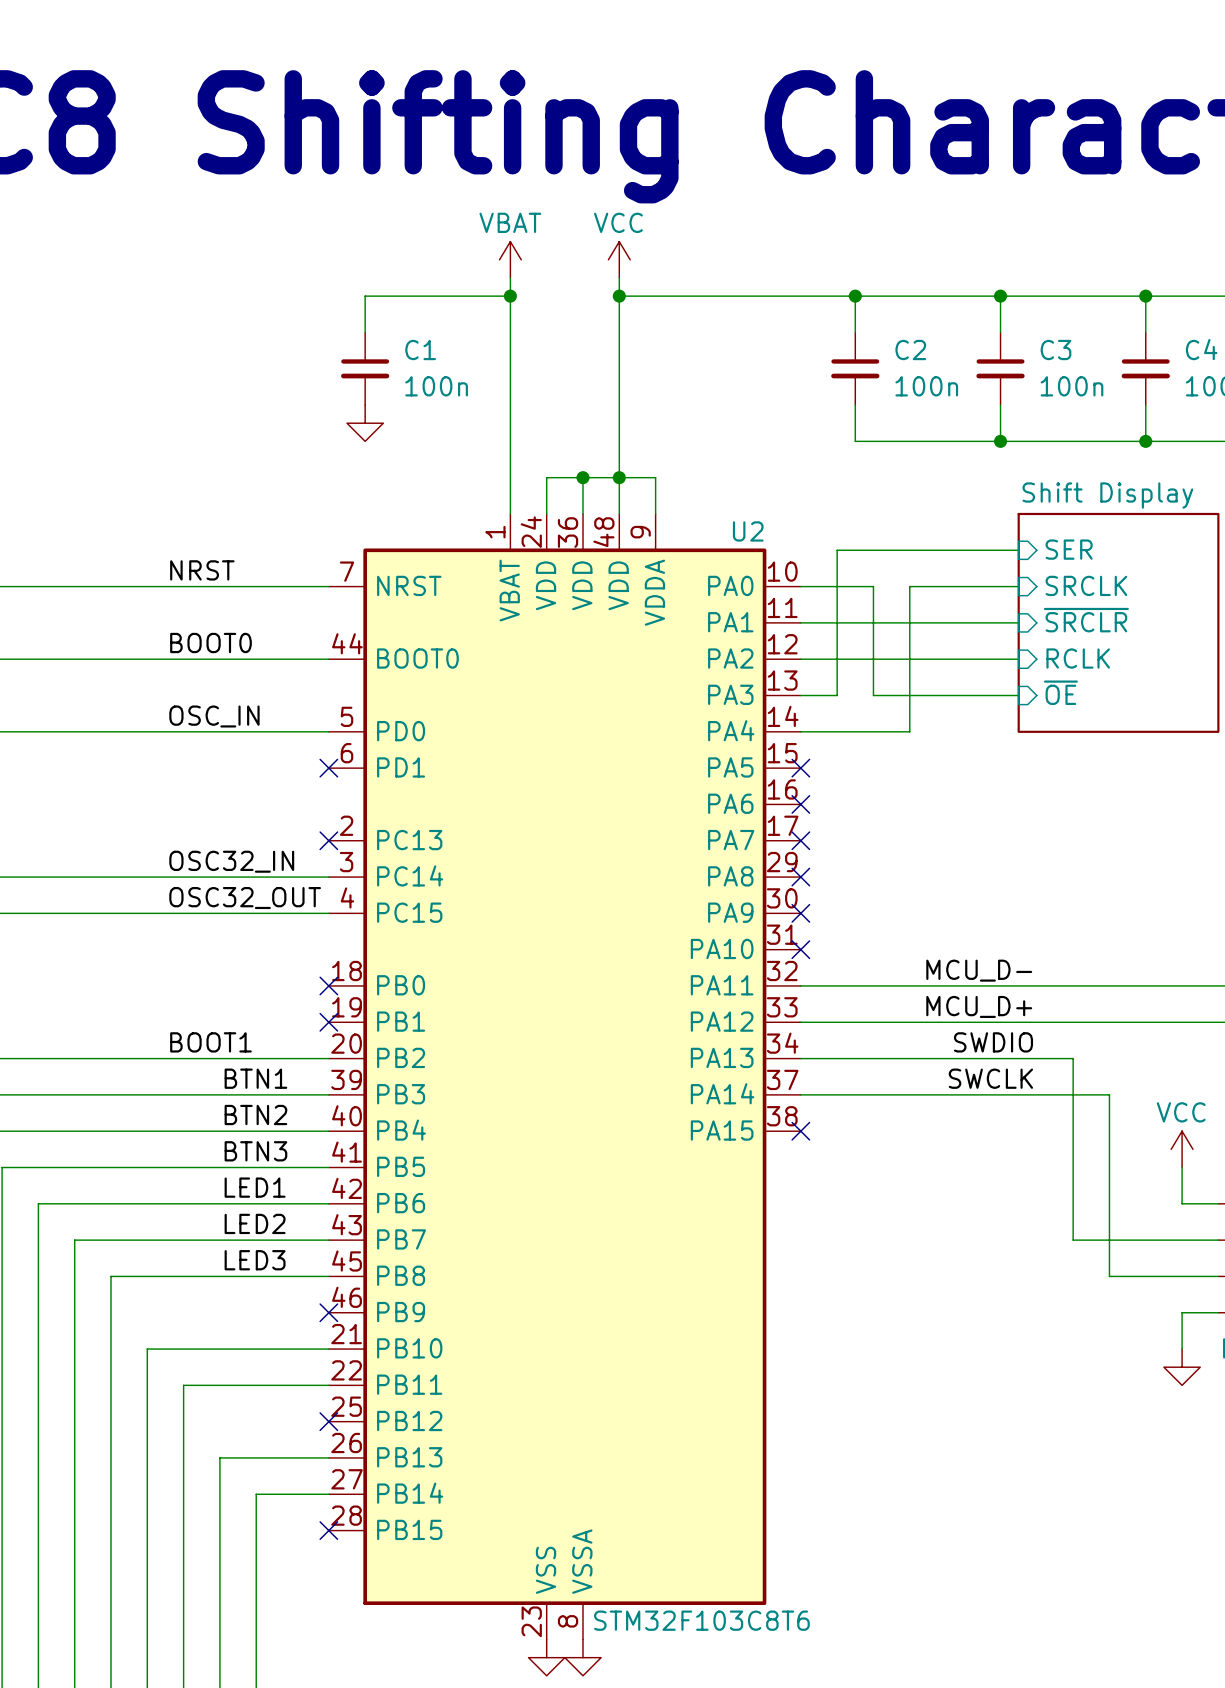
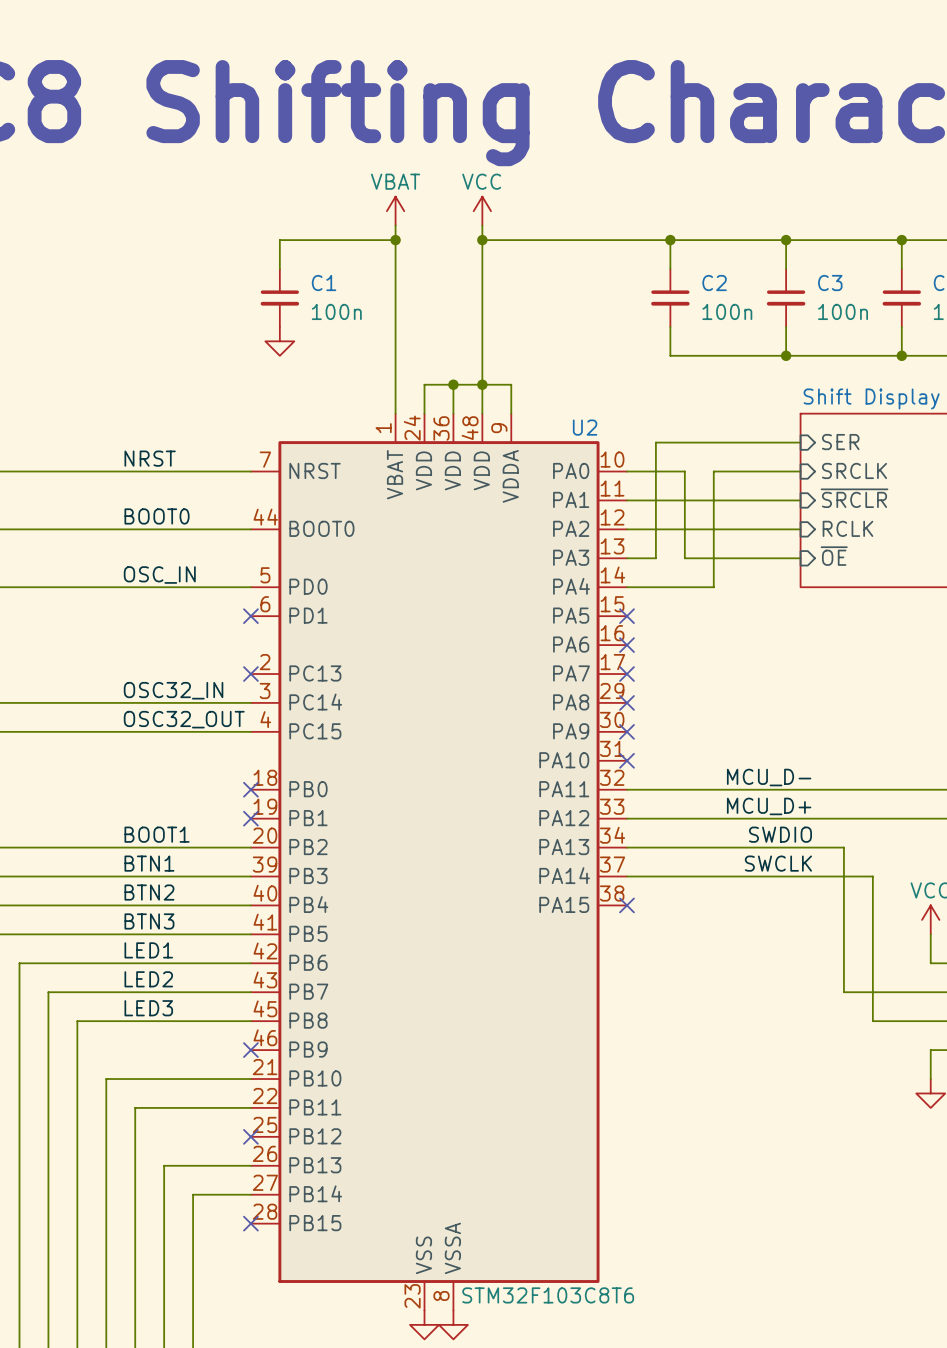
label position: BTN1 (255, 1078) -> BTN1 (149, 863)
label position: BTN2 (255, 1115) -> BTN2 (149, 892)
label position: BTN3 (255, 1151) -> BTN3 (149, 921)
label position: LED1 (255, 1187) -> LED1 (148, 950)
label position: LED2 (255, 1223) -> LED2 (148, 979)
label position: LED3 (255, 1260) -> LED3 (148, 1008)

